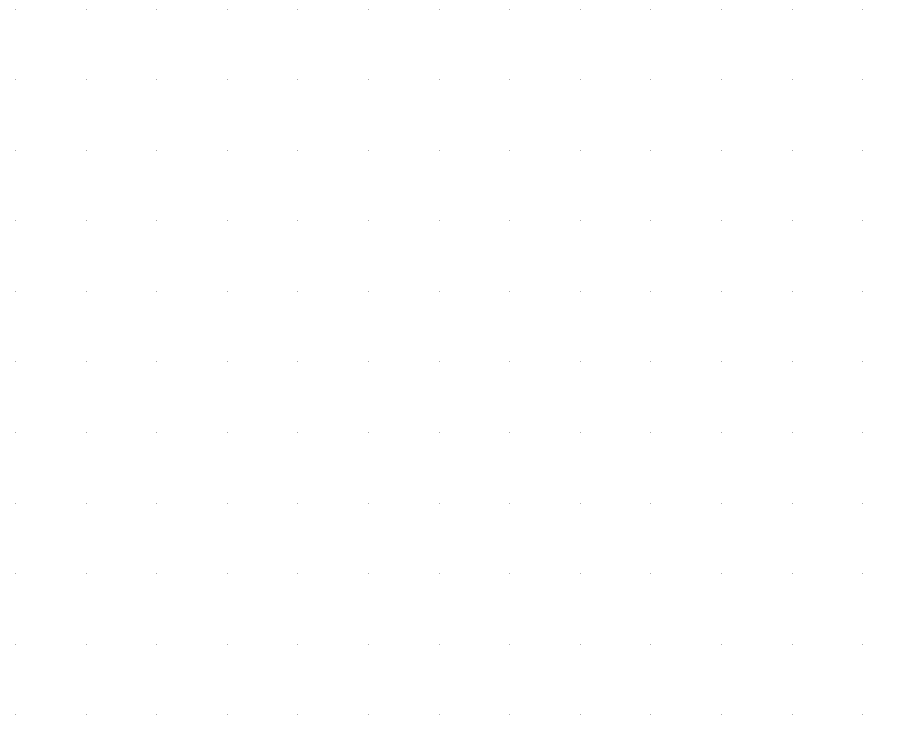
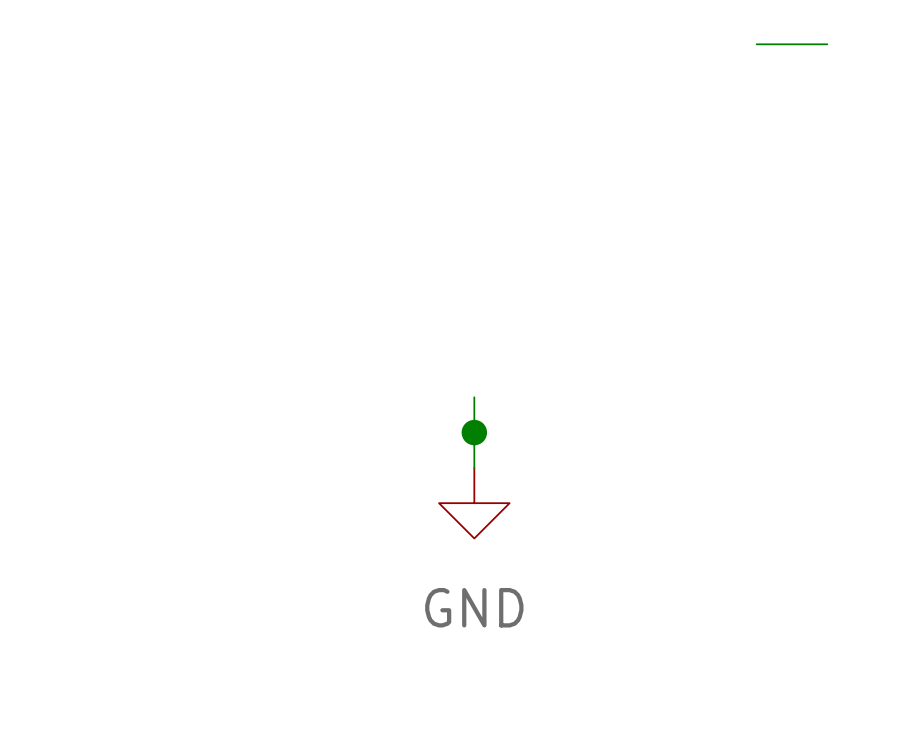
wire: none -> (756, 44) (827, 44)
wire: none -> (474, 397) (474, 467)
junction: none -> (474, 432)
power symbol: none -> GND (474, 503)

